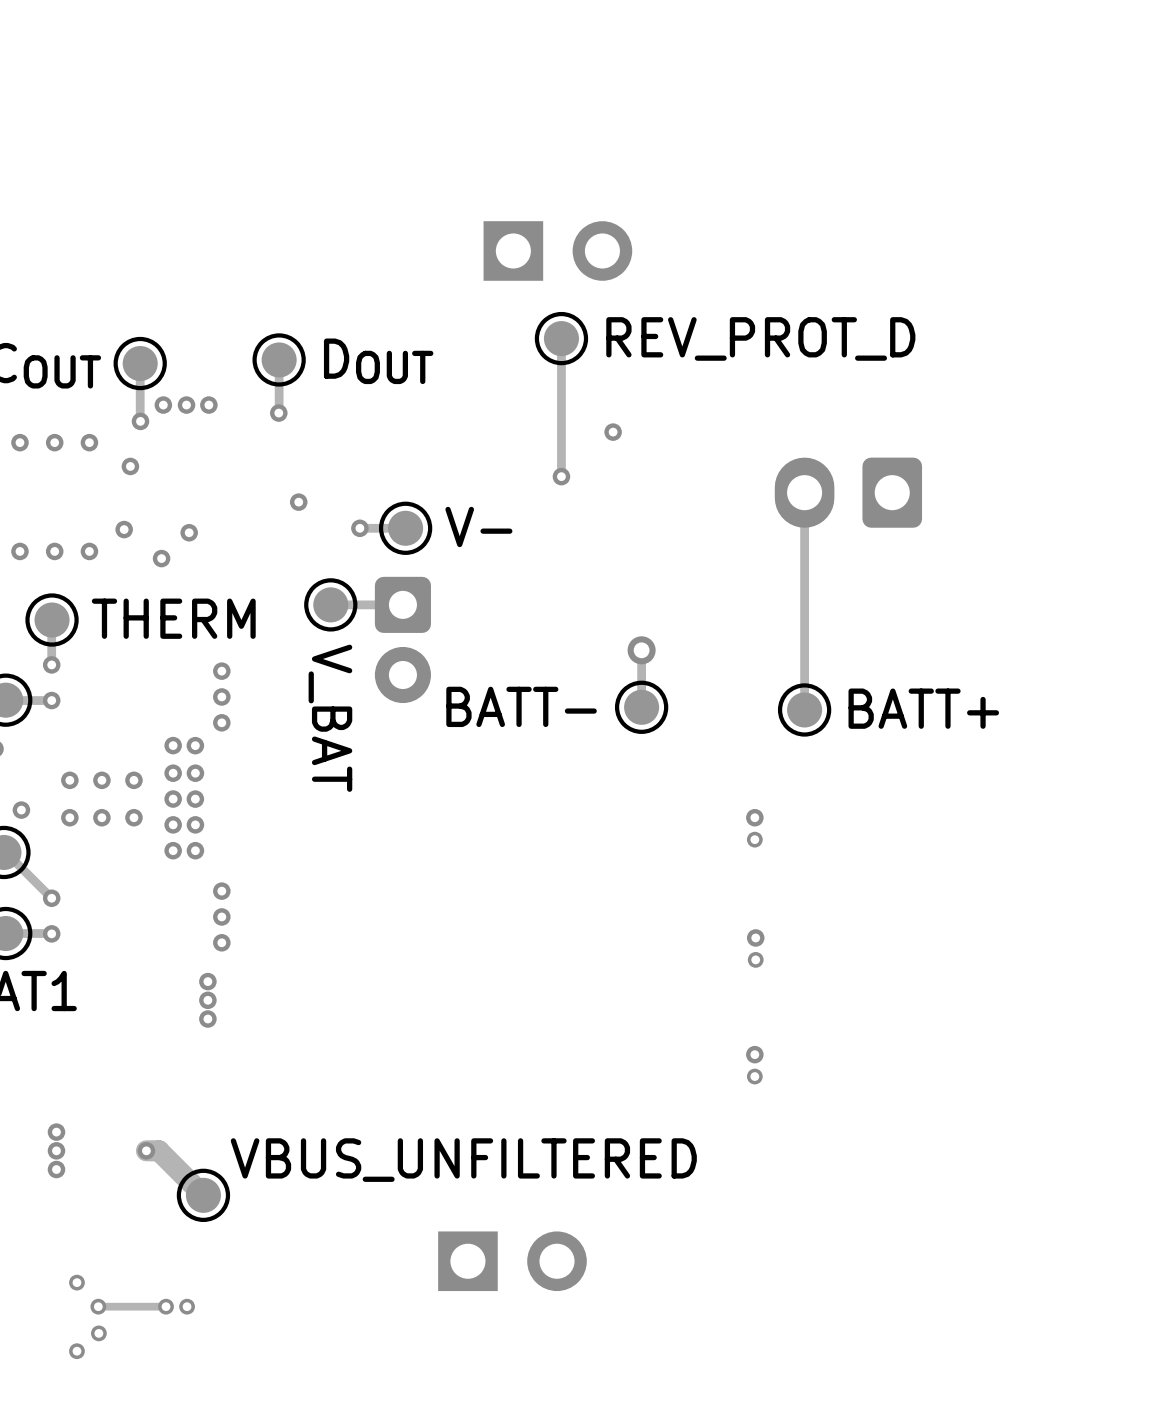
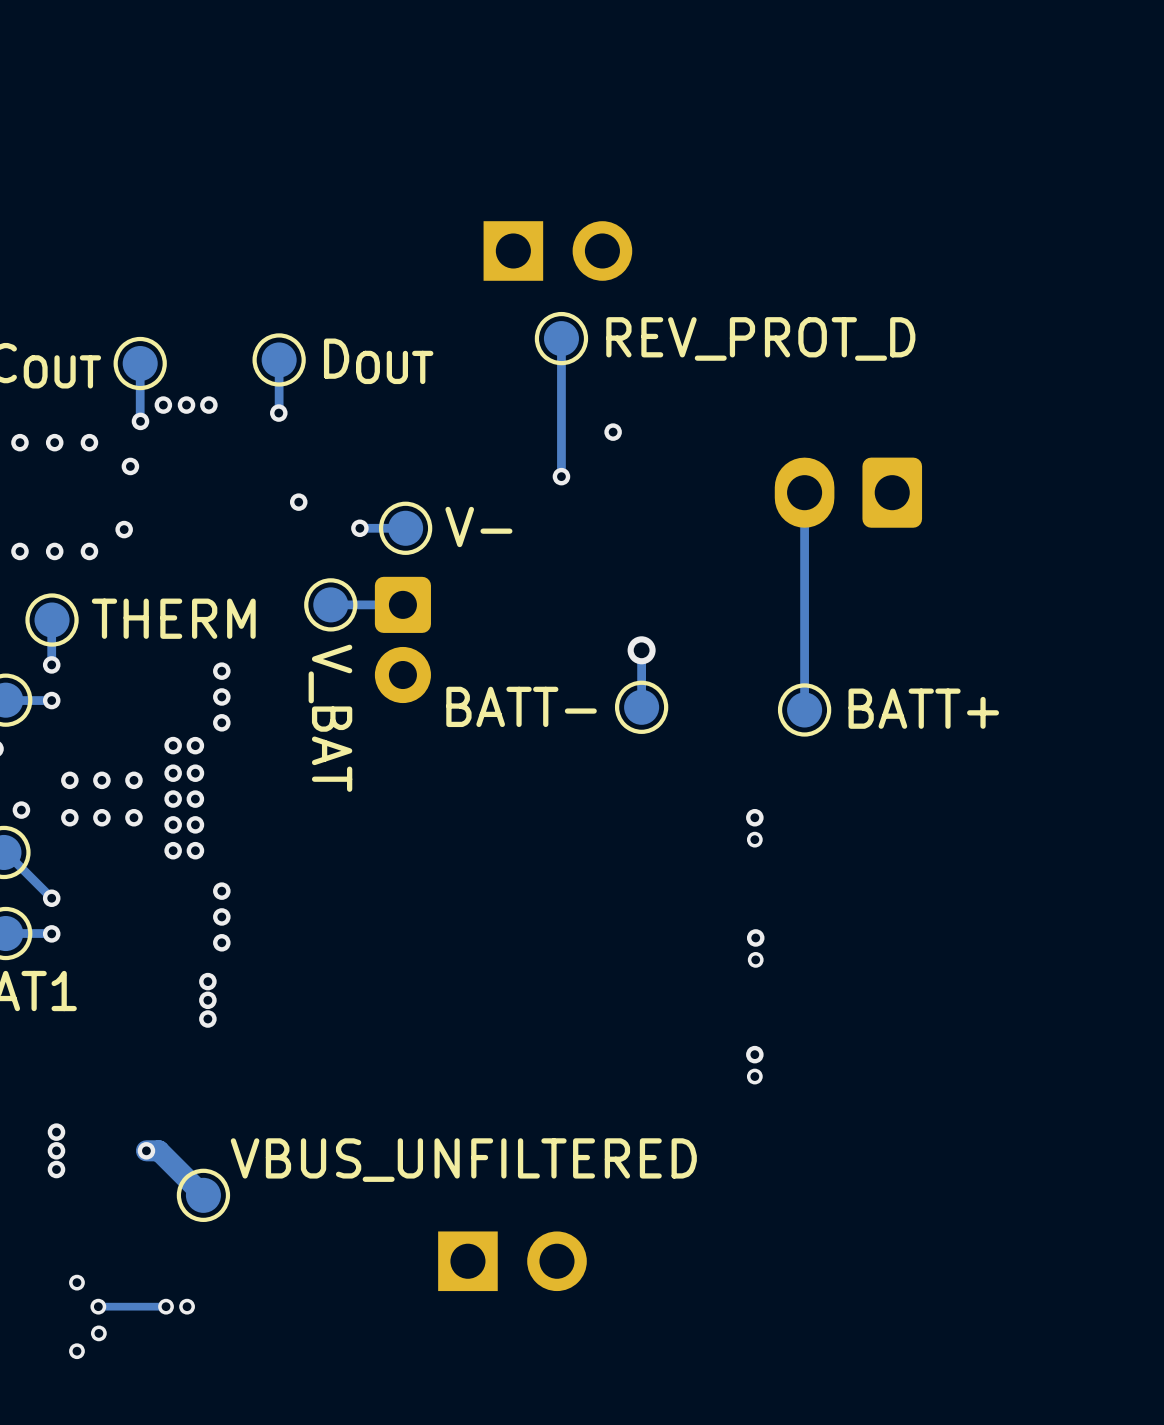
via: (189, 532) -> none
via: (161, 558) -> none

